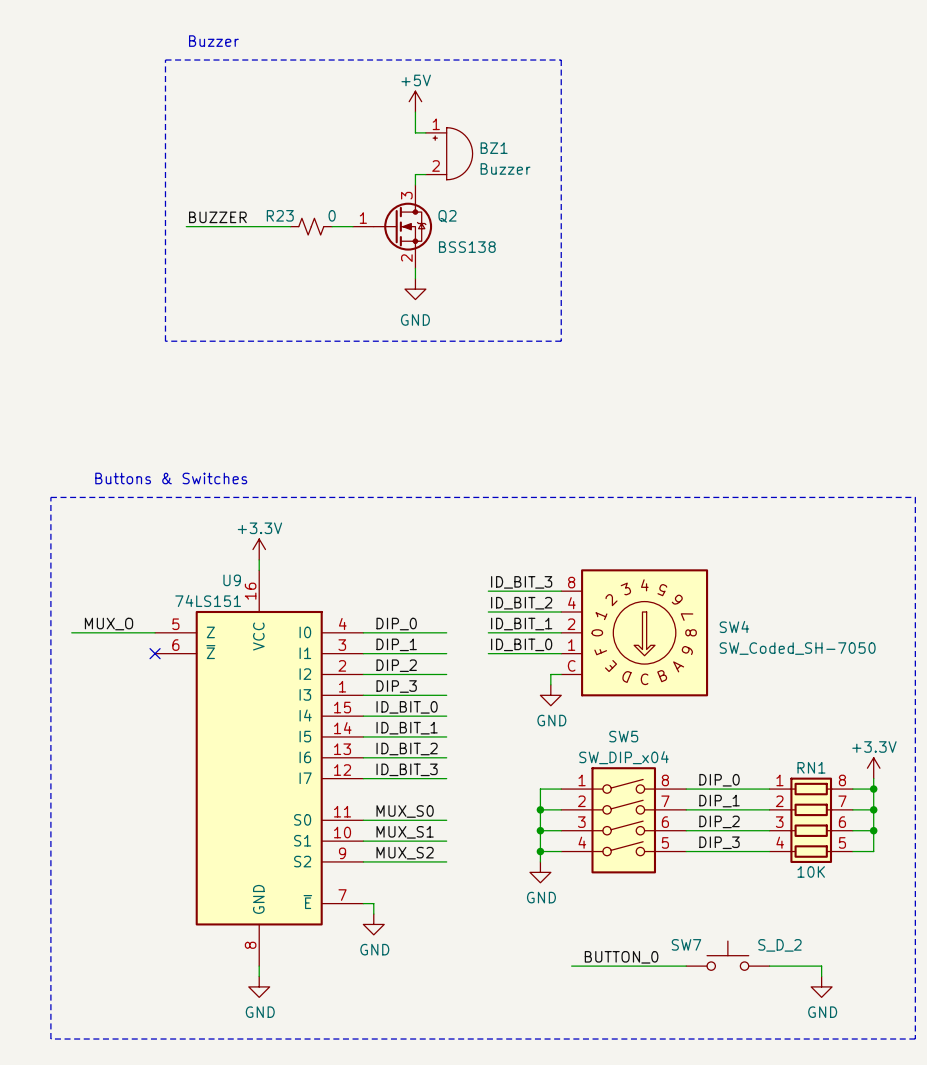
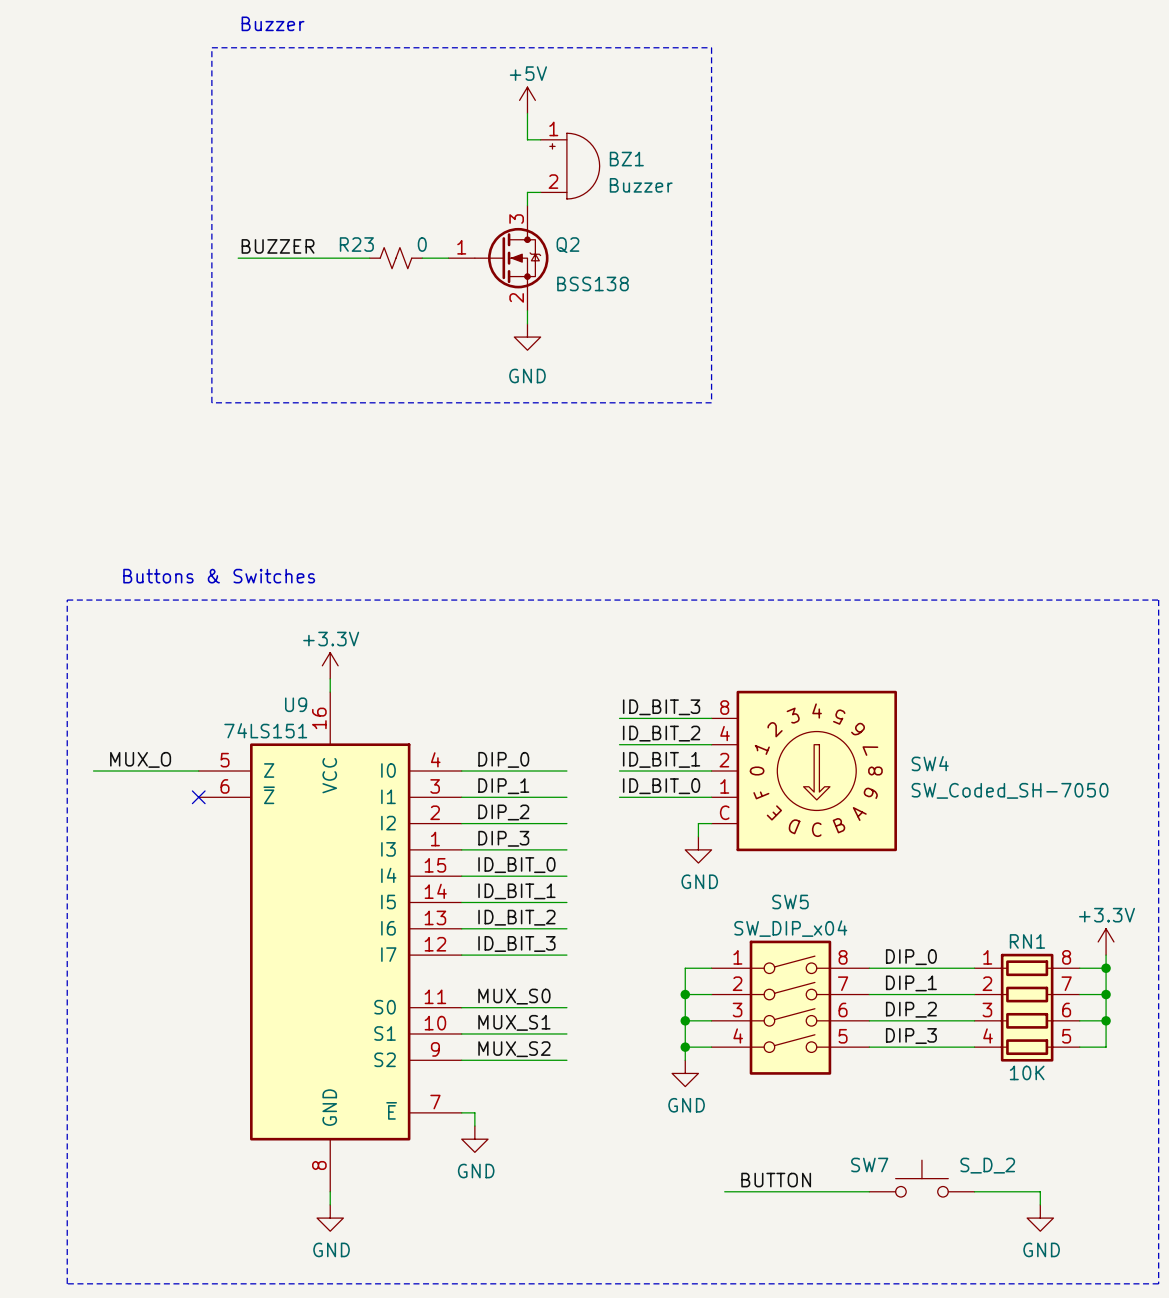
label: BUTTON_0 (621, 957) -> BUTTON (776, 1180)

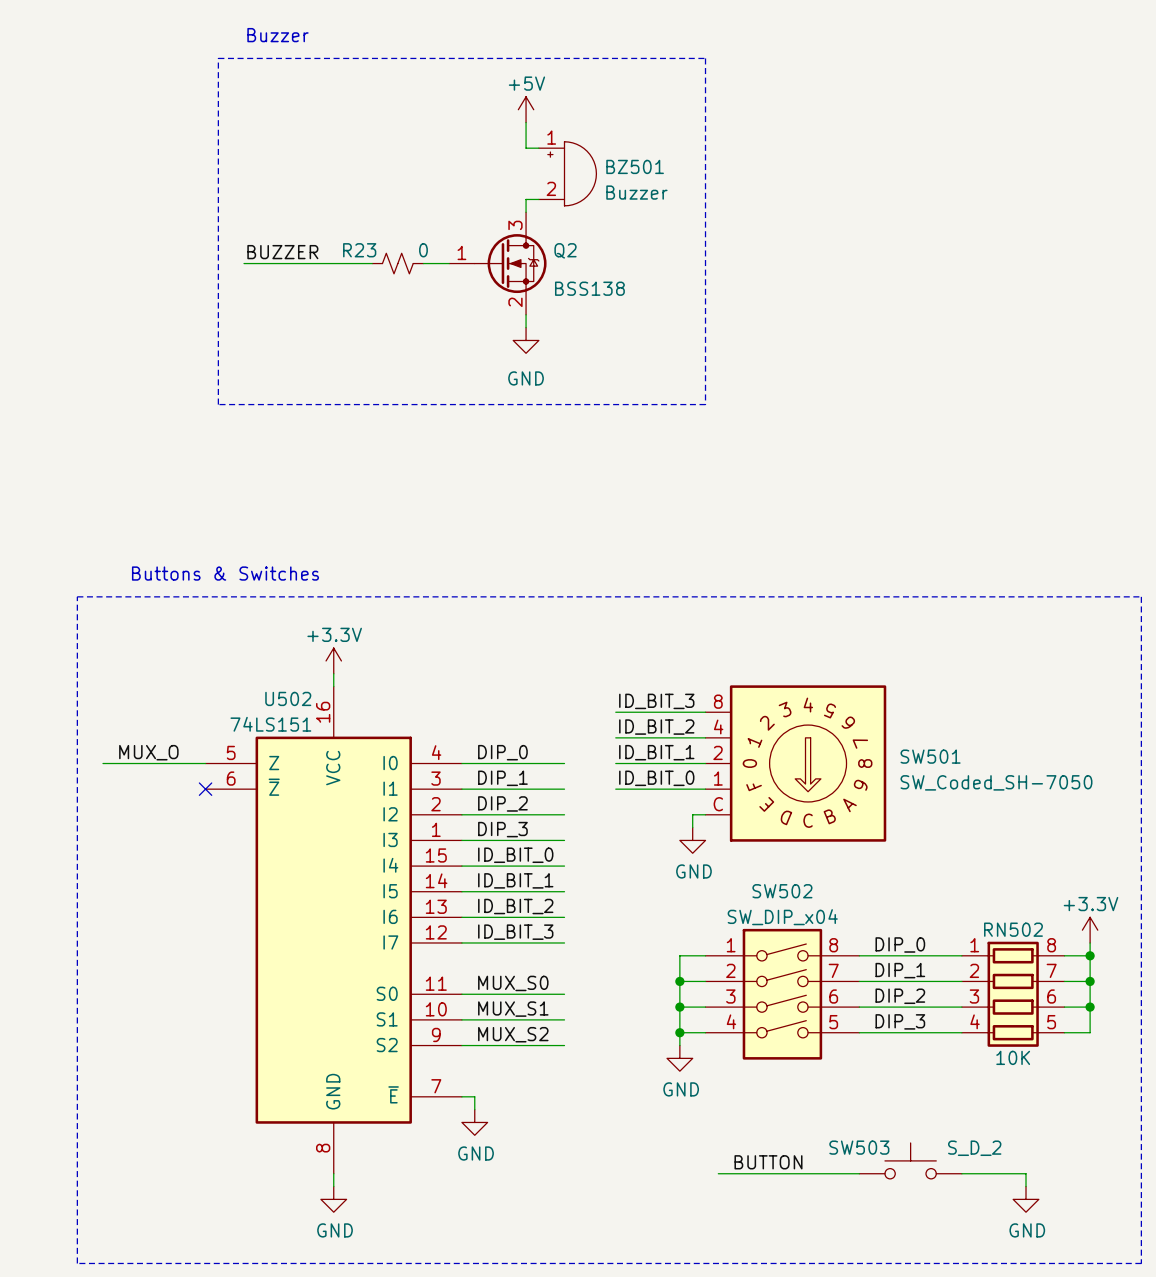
BZ1 name: BZ1 (626, 159) -> BZ501 (635, 166)
U9 name: U9 (296, 704) -> U502 (288, 698)
SW4 name: SW4 (930, 763) -> SW501 (930, 756)
SW5 name: SW5 (790, 902) -> SW502 (782, 891)
RN1 name: RN1 (1027, 941) -> RN502 (1013, 929)
SW7 name: SW7 (869, 1164) -> SW503 (859, 1147)

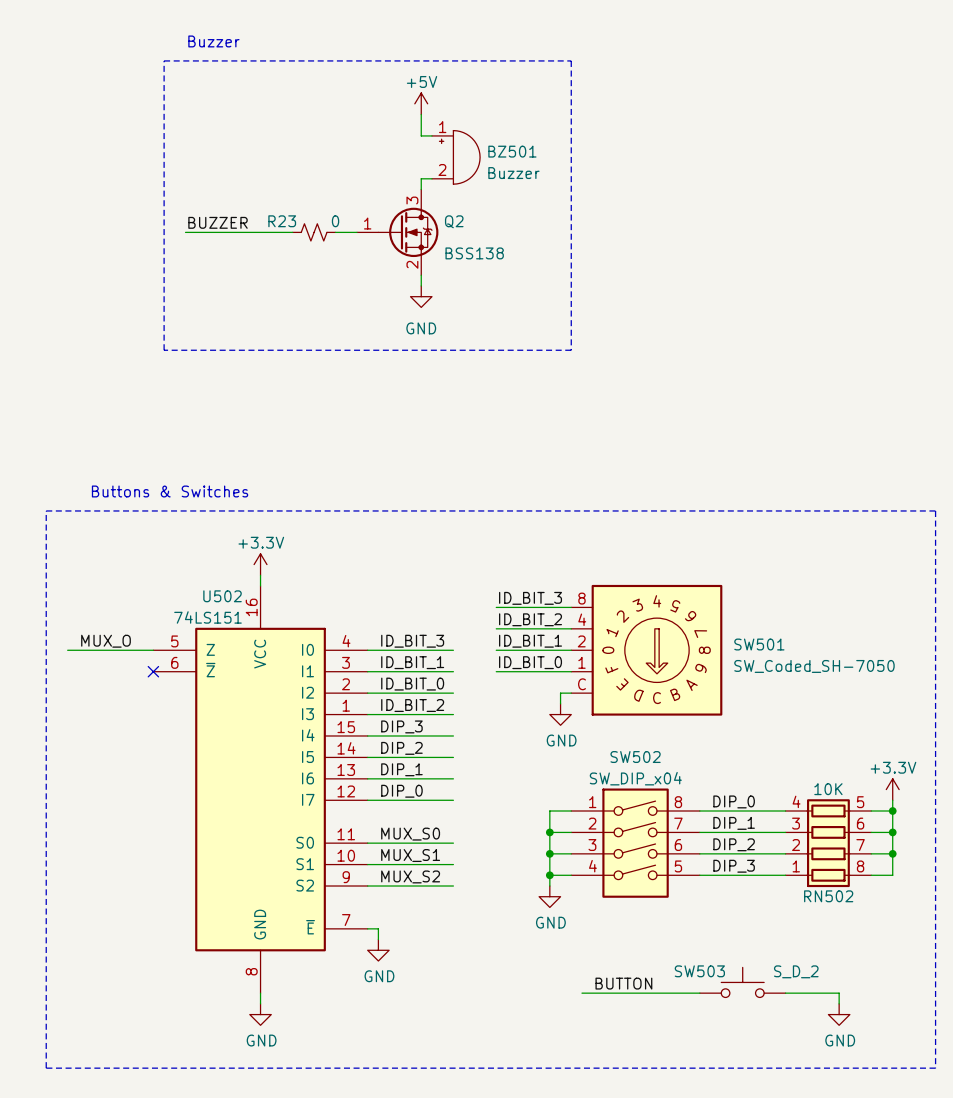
label: DIP_0 (502, 752) -> ID_BIT_3 (412, 641)
label: DIP_1 (502, 778) -> ID_BIT_1 (412, 662)
label: DIP_2 (502, 803) -> ID_BIT_0 (412, 684)
label: DIP_3 (502, 829) -> ID_BIT_2 (412, 705)
label: ID_BIT_0 (515, 855) -> DIP_3 (401, 726)
label: ID_BIT_1 (515, 880) -> DIP_2 (401, 748)
label: ID_BIT_2 (515, 906) -> DIP_1 (401, 769)
label: ID_BIT_3 (515, 932) -> DIP_0 (401, 791)
RN502 flip: as is (1013, 994) -> up-down (828, 843)

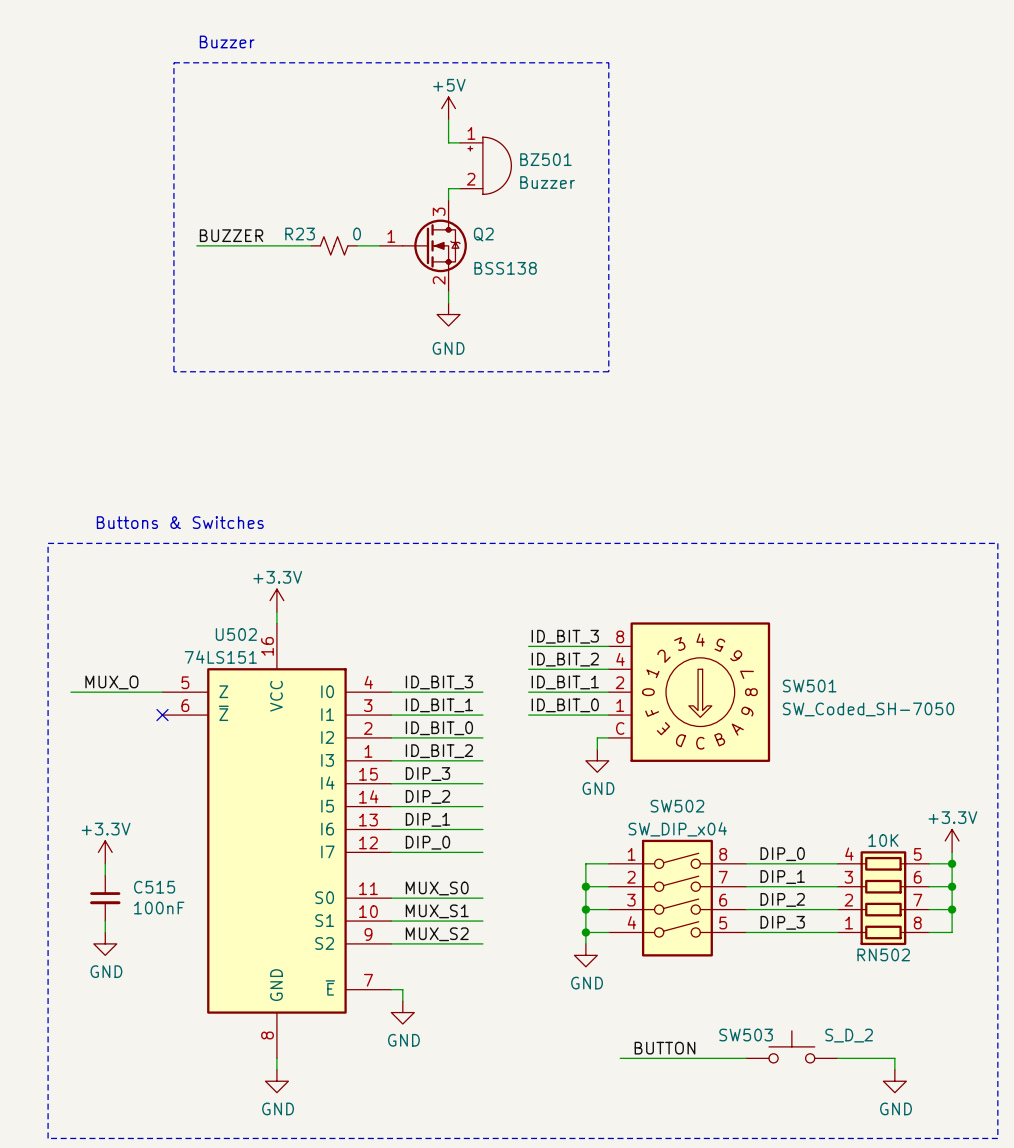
power symbol: none -> +3.3V (105, 852)
wire: none -> (105, 863) (105, 875)
C515: none -> 100nF (105, 898)
wire: none -> (105, 921) (105, 932)
power symbol: none -> GND (105, 943)

